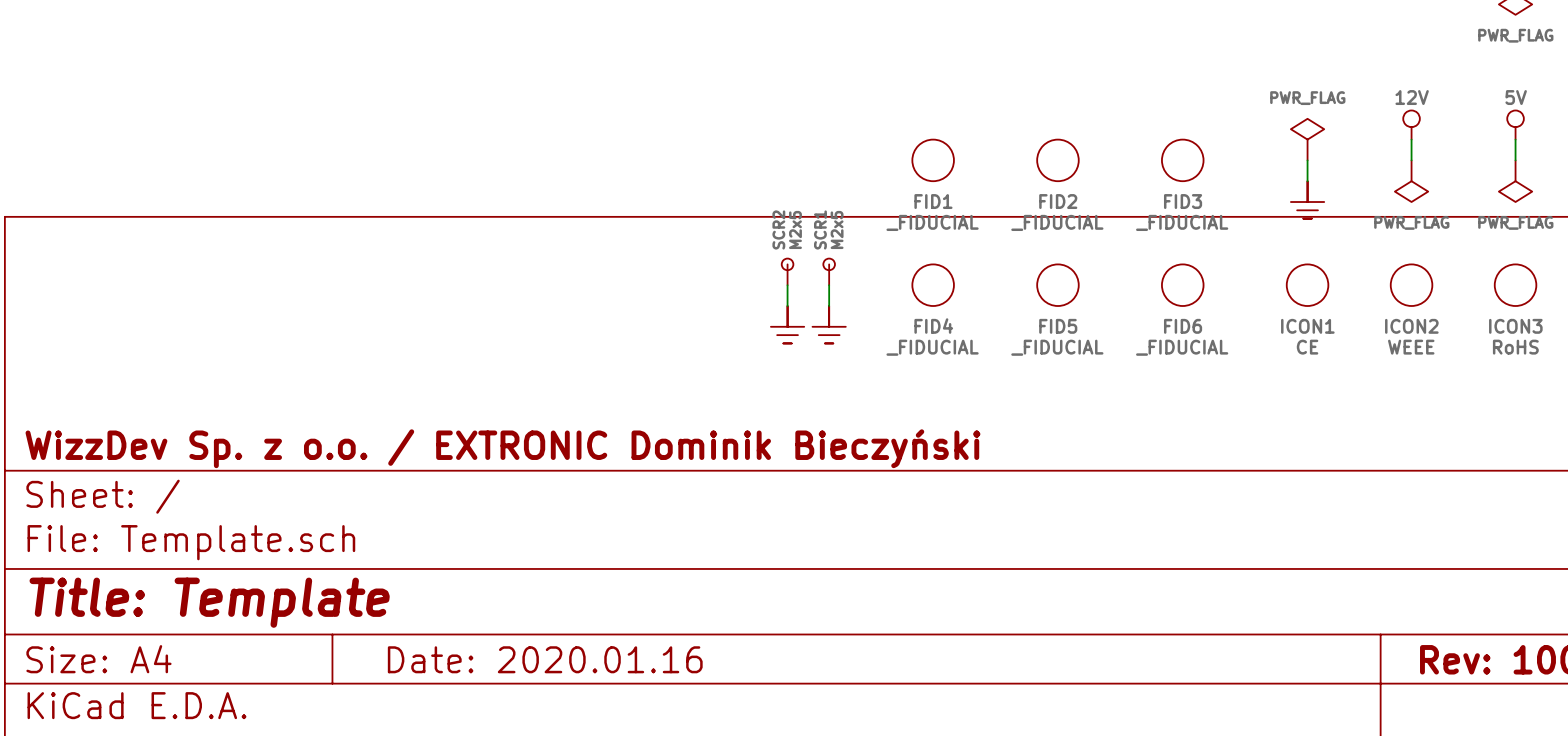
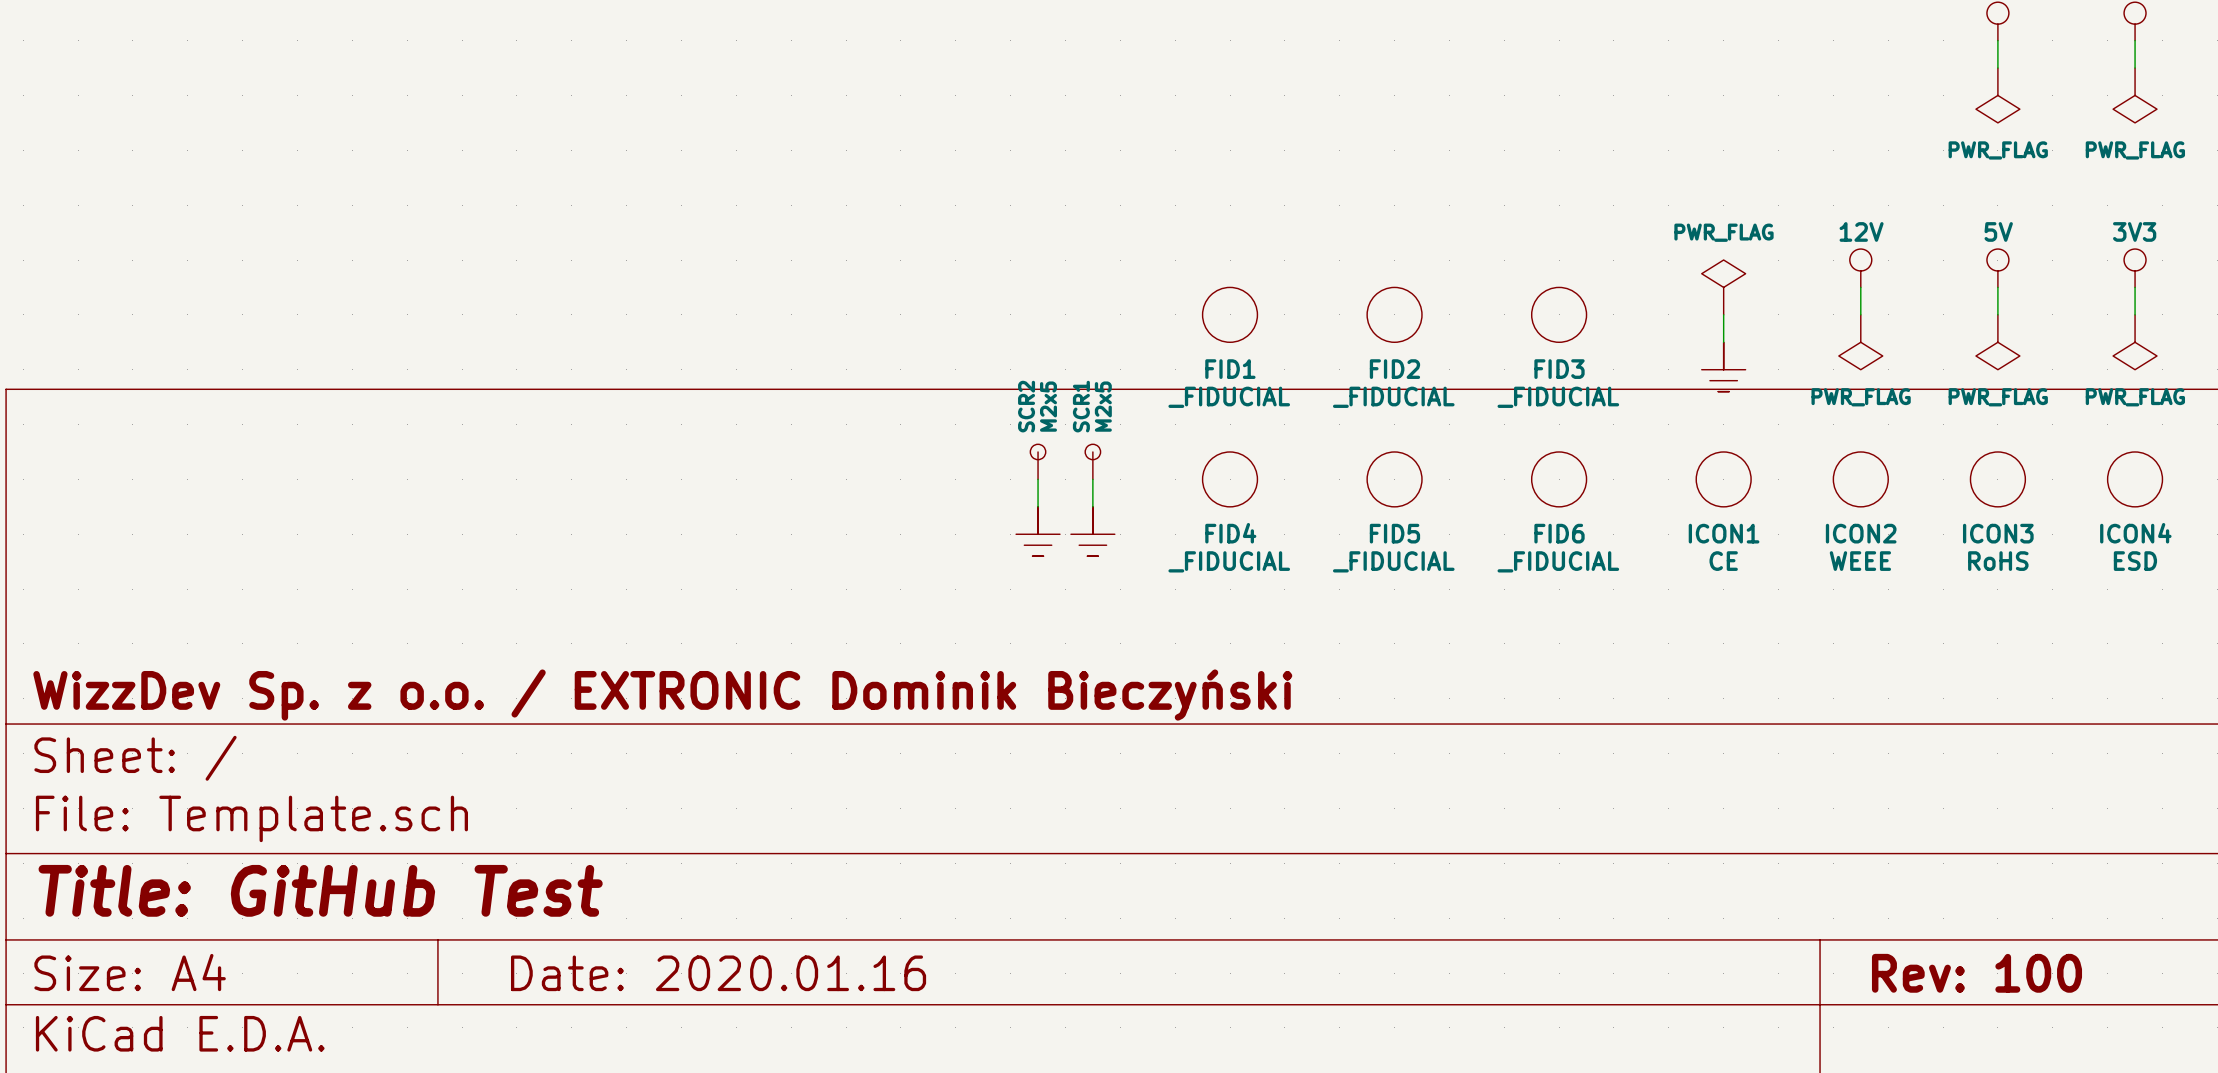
title block: Title: Template (209, 602) -> Title: GitHub Test (320, 890)

